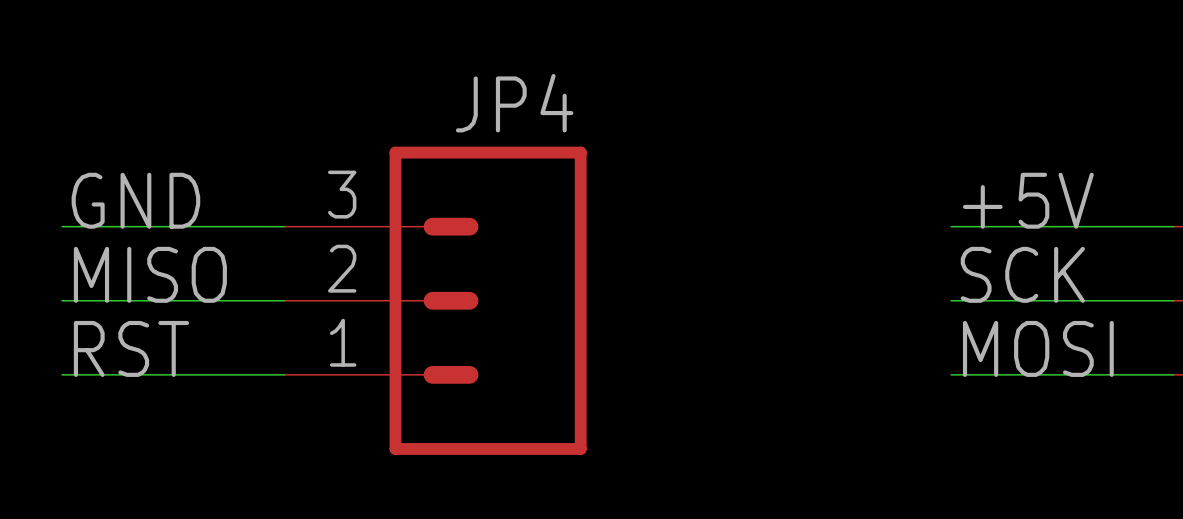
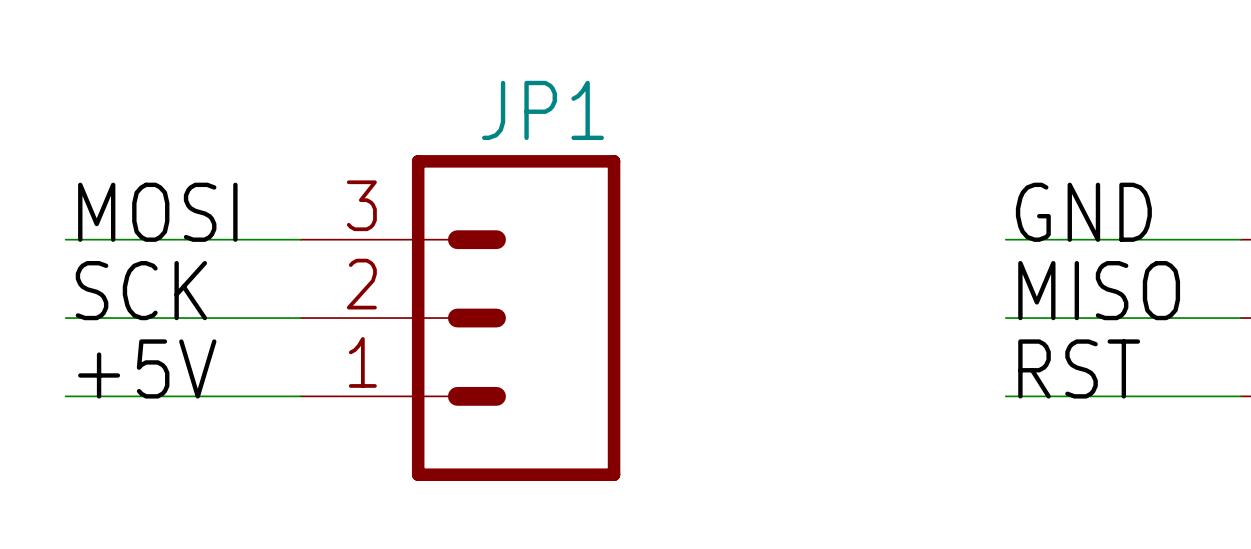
JP4 name: JP4 (514, 103) -> JP1 (543, 110)
label: GND (135, 200) -> MOSI (157, 212)
label: +5V (1028, 200) -> GND (1083, 212)
label: MISO (150, 274) -> SCK (141, 290)
label: SCK (1022, 274) -> MISO (1099, 290)
label: RST (131, 348) -> +5V (147, 368)
label: MOSI (1038, 348) -> RST (1079, 368)

